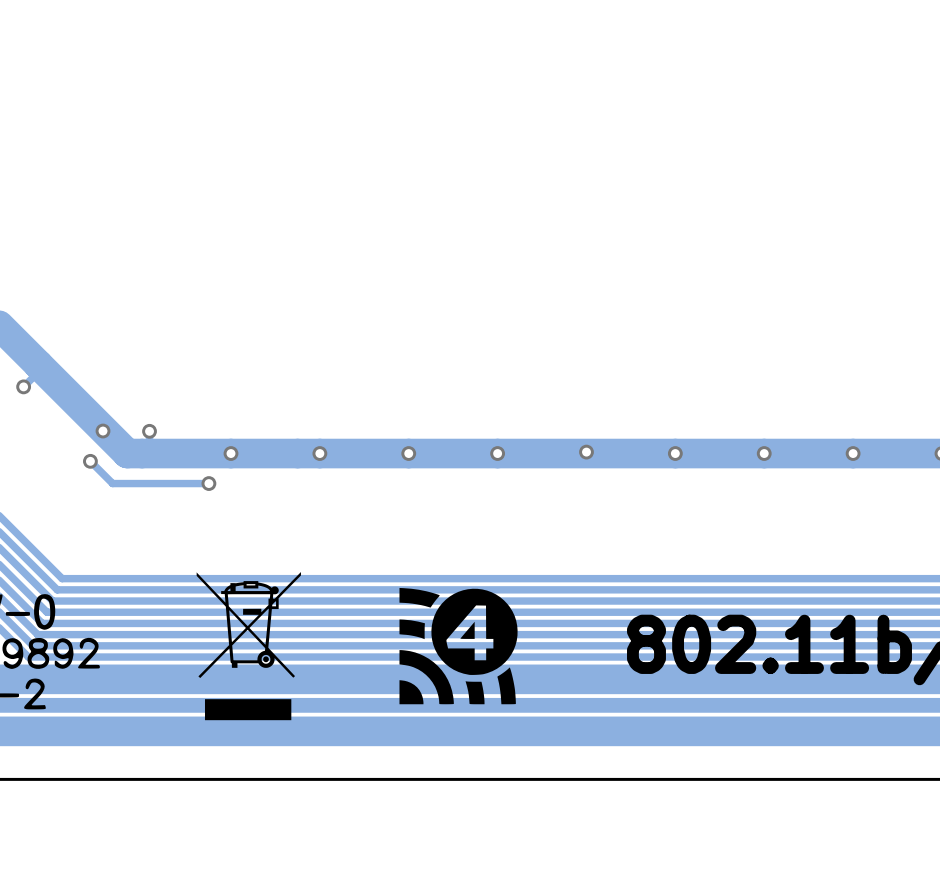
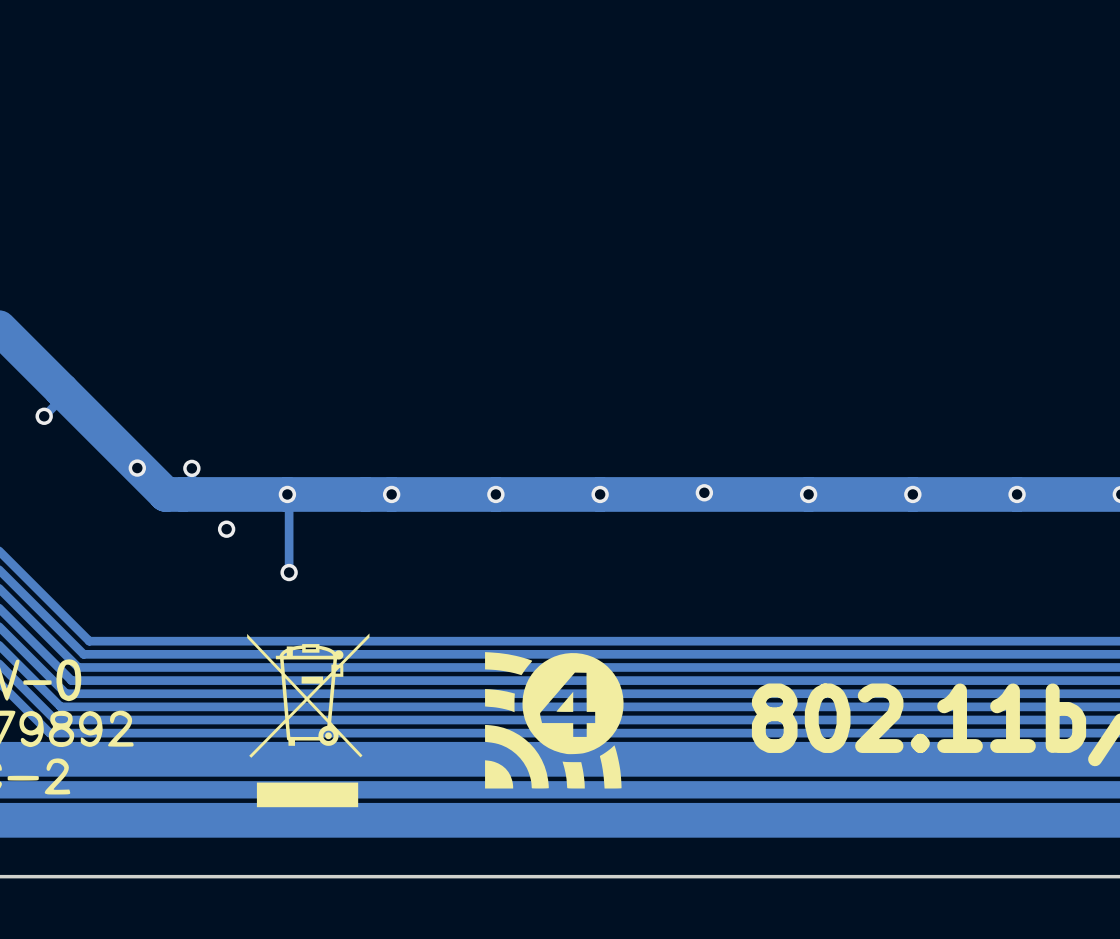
track: none -> (289, 496) (289, 572)
track: (90, 461) (112, 483) (208, 483) -> none
via: (90, 461) -> none
via: none -> (226, 529)
via: (208, 483) -> none
via: none -> (289, 572)

